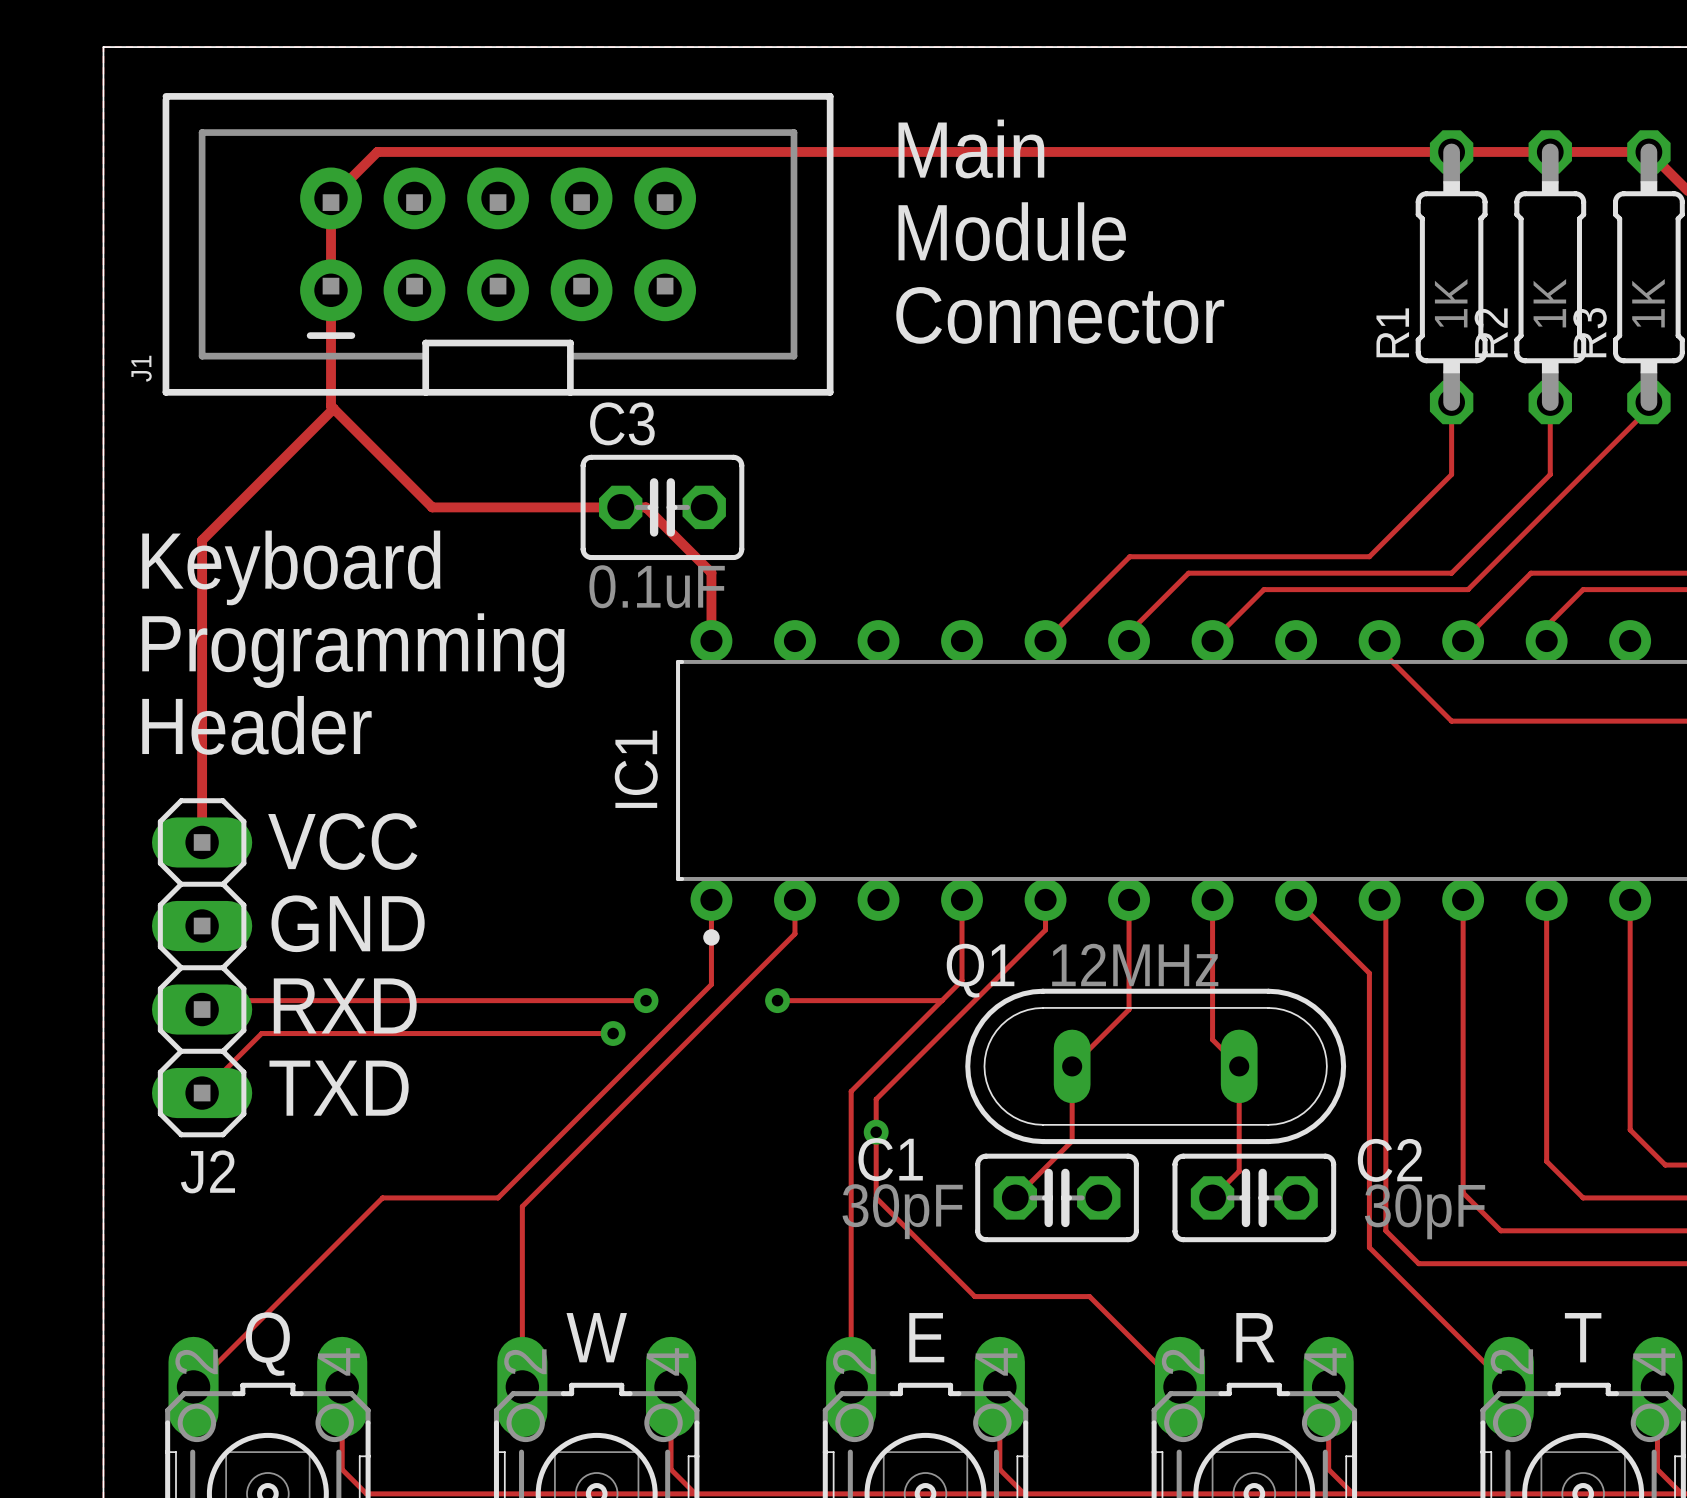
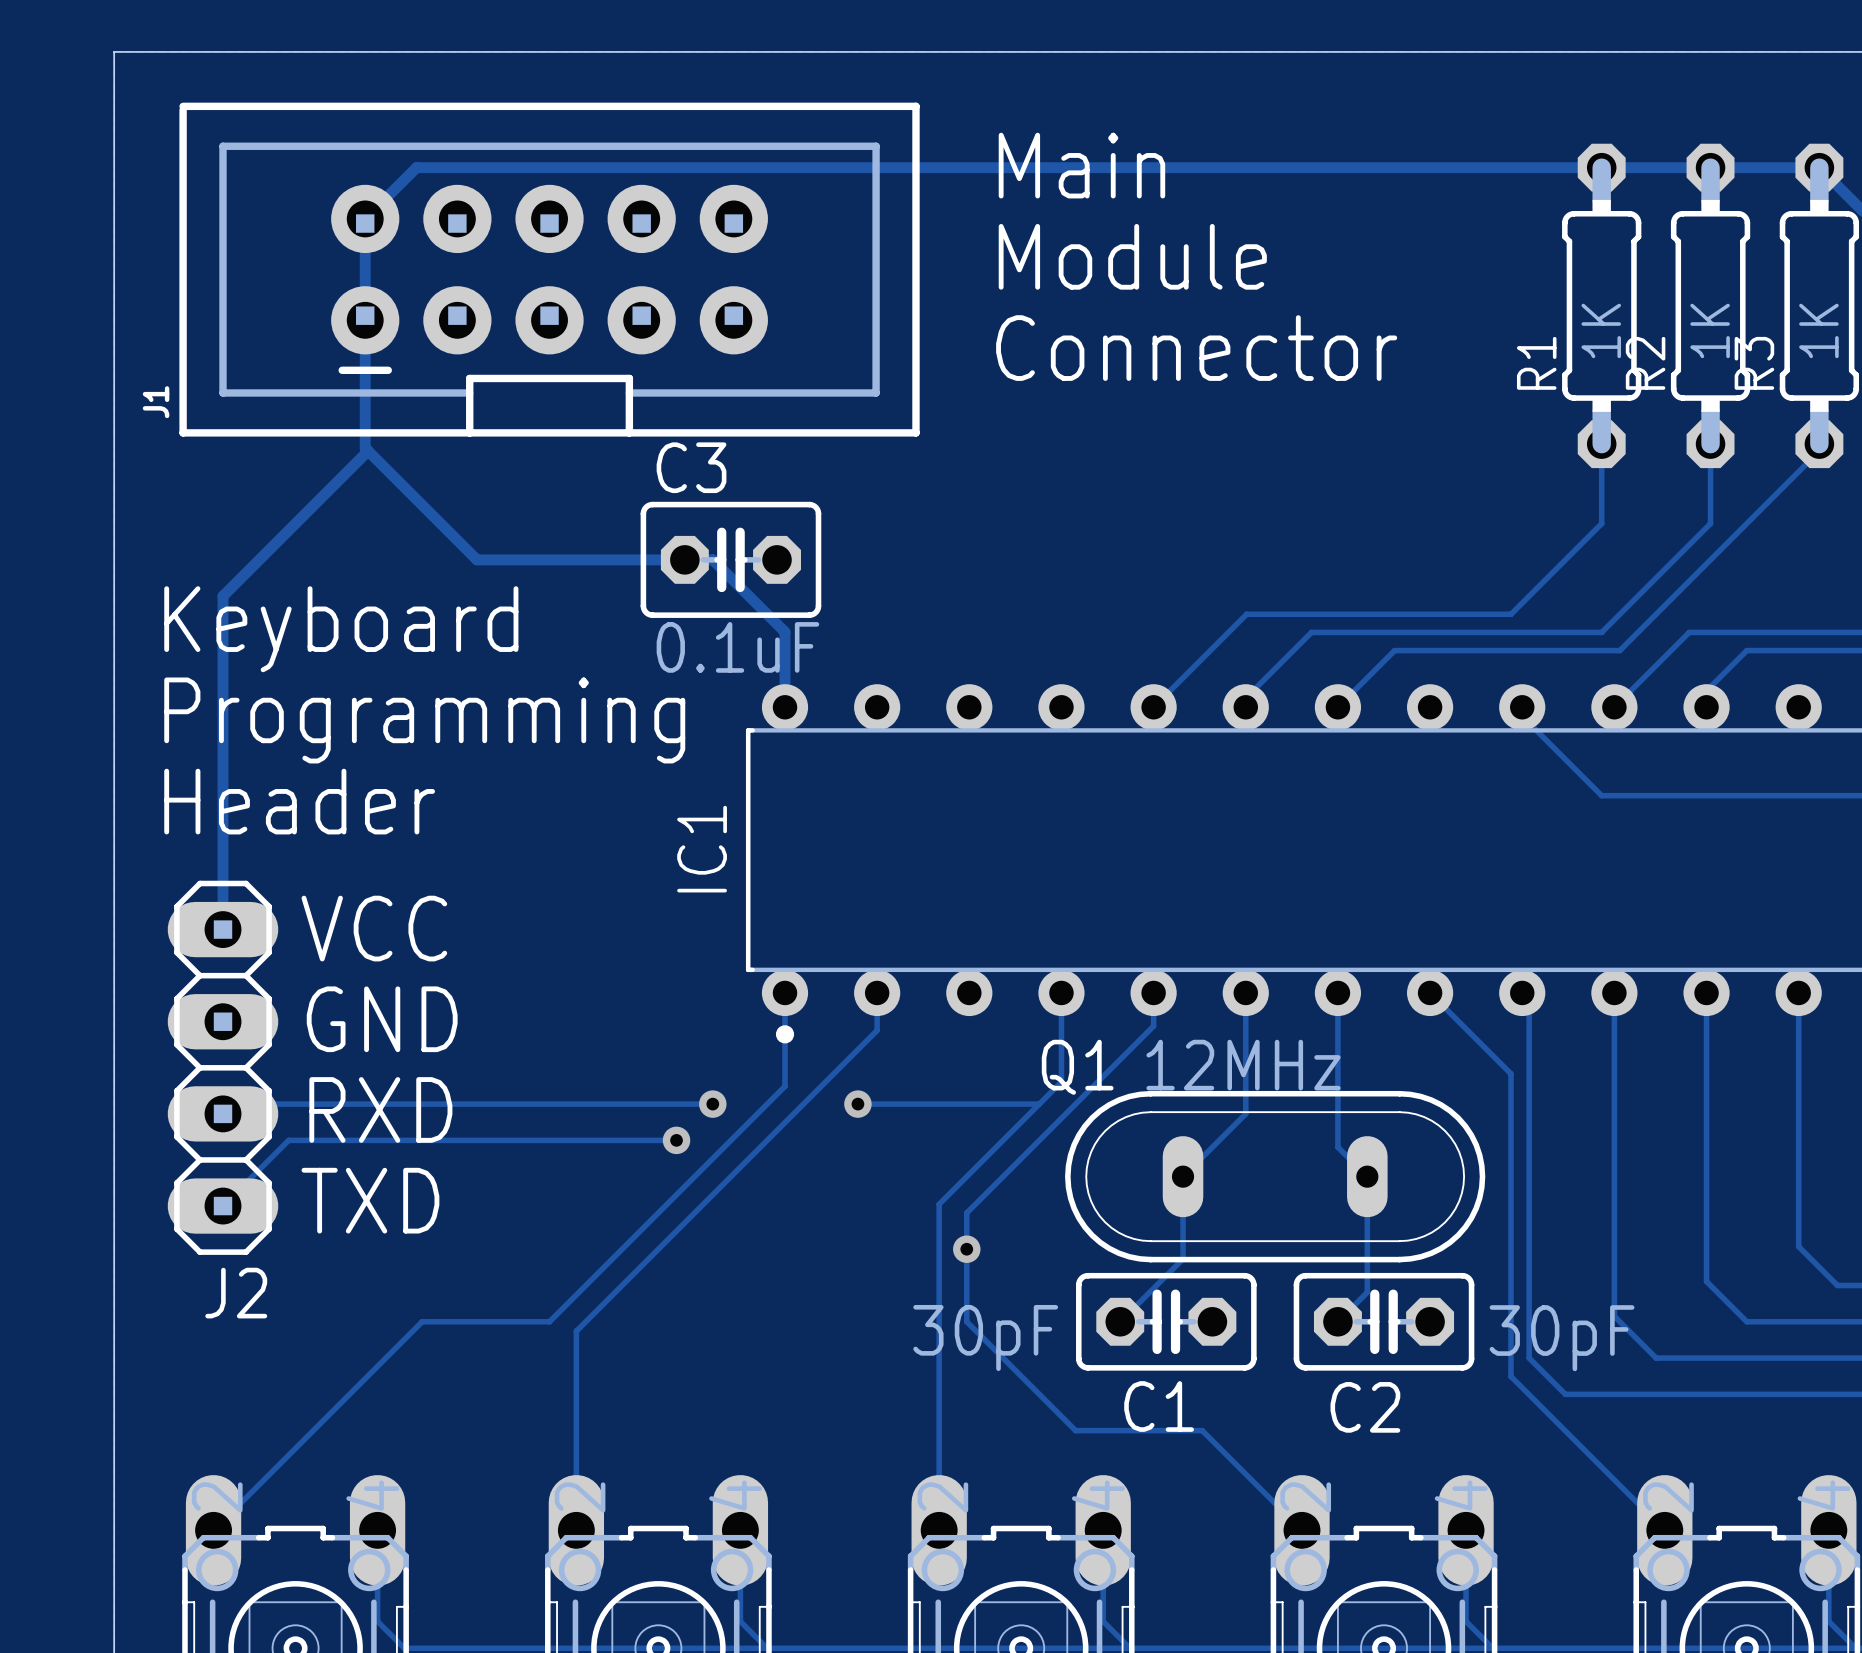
C1 name position: C1 (890, 1159) -> C1 (1159, 1406)
C2 name position: C2 (1389, 1160) -> C2 (1365, 1407)
text: W (596, 1337) -> none
text: E (926, 1337) -> none
text: R (1255, 1337) -> none
text: T (1583, 1337) -> none
text: Q (267, 1344) -> none

